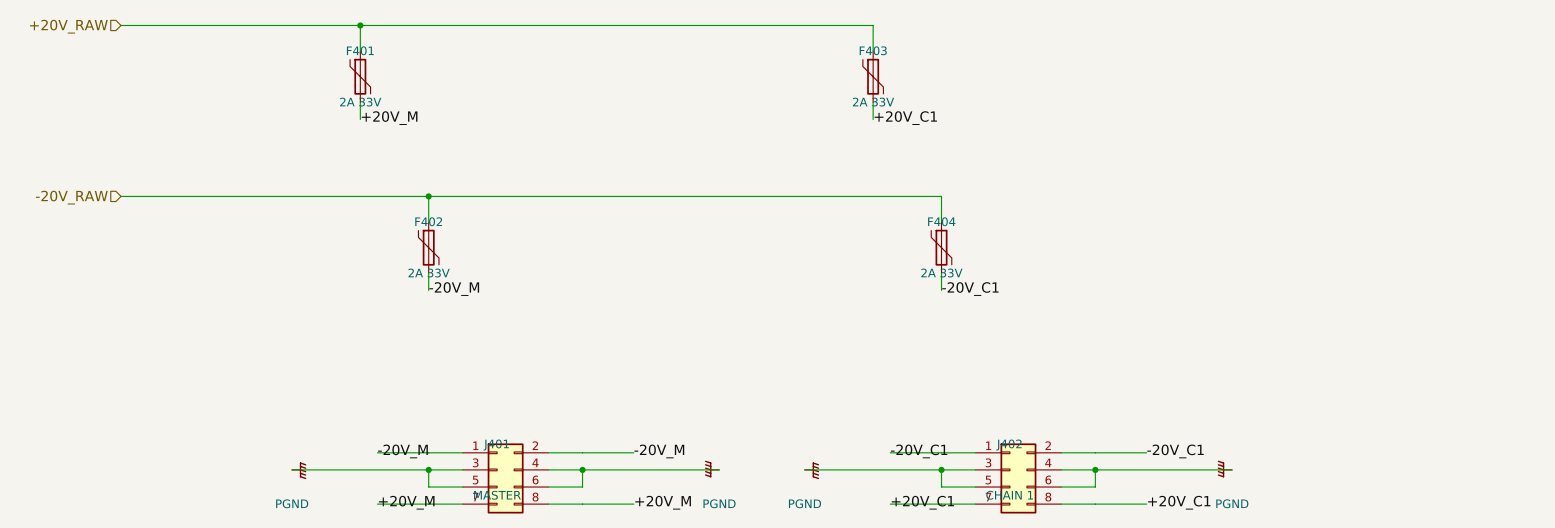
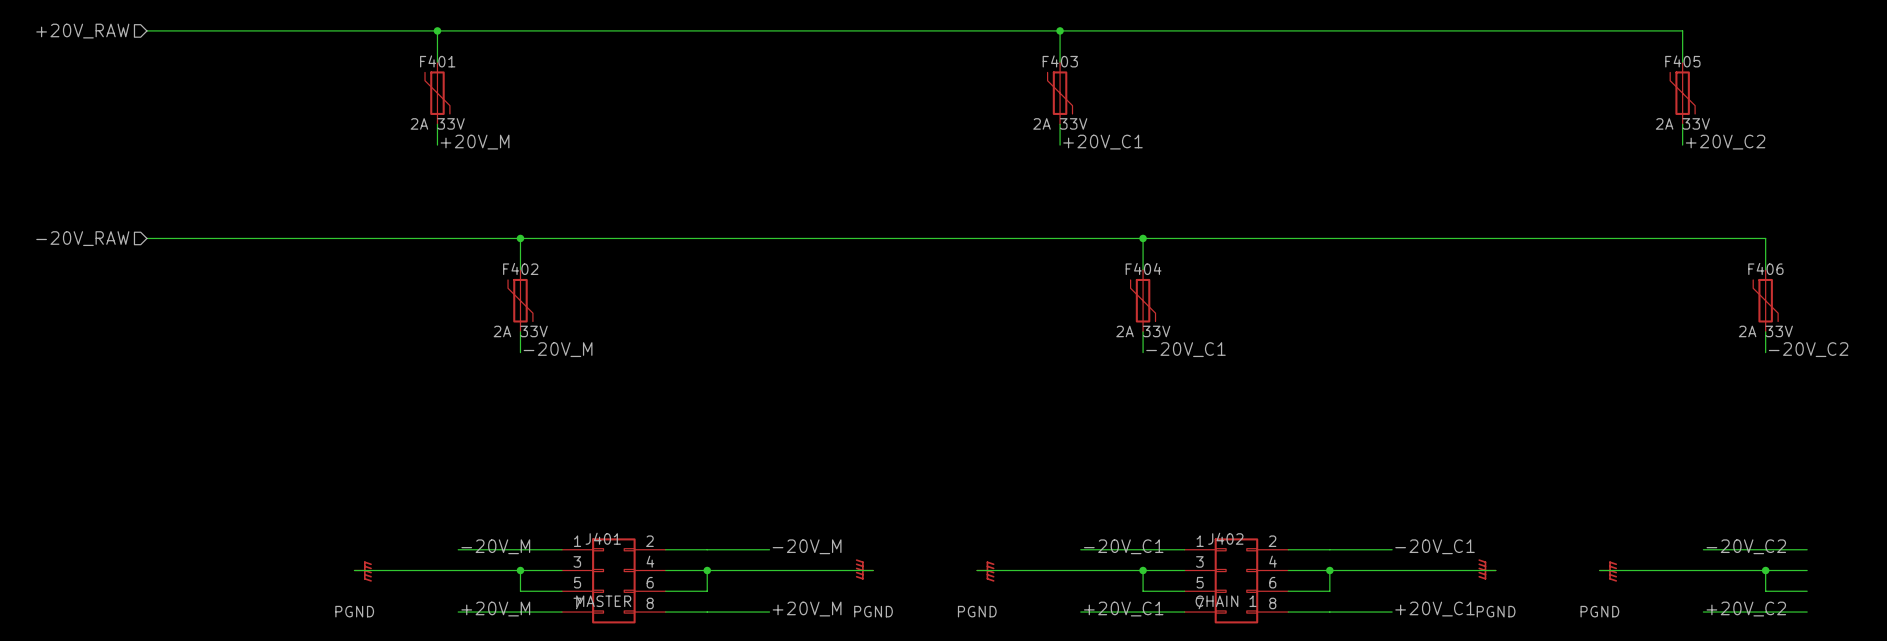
wire: none -> (1060, 30) (1682, 30) (1682, 62)
junction: none -> (1060, 30)
F405: none -> 2A 33V (1682, 93)
wire: none -> (1682, 124) (1682, 145)
label: none -> +20V_C2 (1725, 142)
wire: none -> (1143, 238) (1765, 238) (1765, 269)
junction: none -> (1143, 238)
F406: none -> 2A 33V (1765, 300)
wire: none -> (1765, 331) (1765, 352)
label: none -> -20V_C2 (1808, 349)
label: none -> -20V_C2 (1746, 546)
wire: none -> (1703, 549) (1807, 549)
wire: none -> (1599, 570) (1807, 570)
wire: none -> (1765, 570) (1765, 591) (1807, 591)
junction: none -> (1765, 570)
power symbol: none -> PGND (1608, 571)
label: none -> +20V_C2 (1746, 609)
wire: none -> (1703, 612) (1807, 612)

